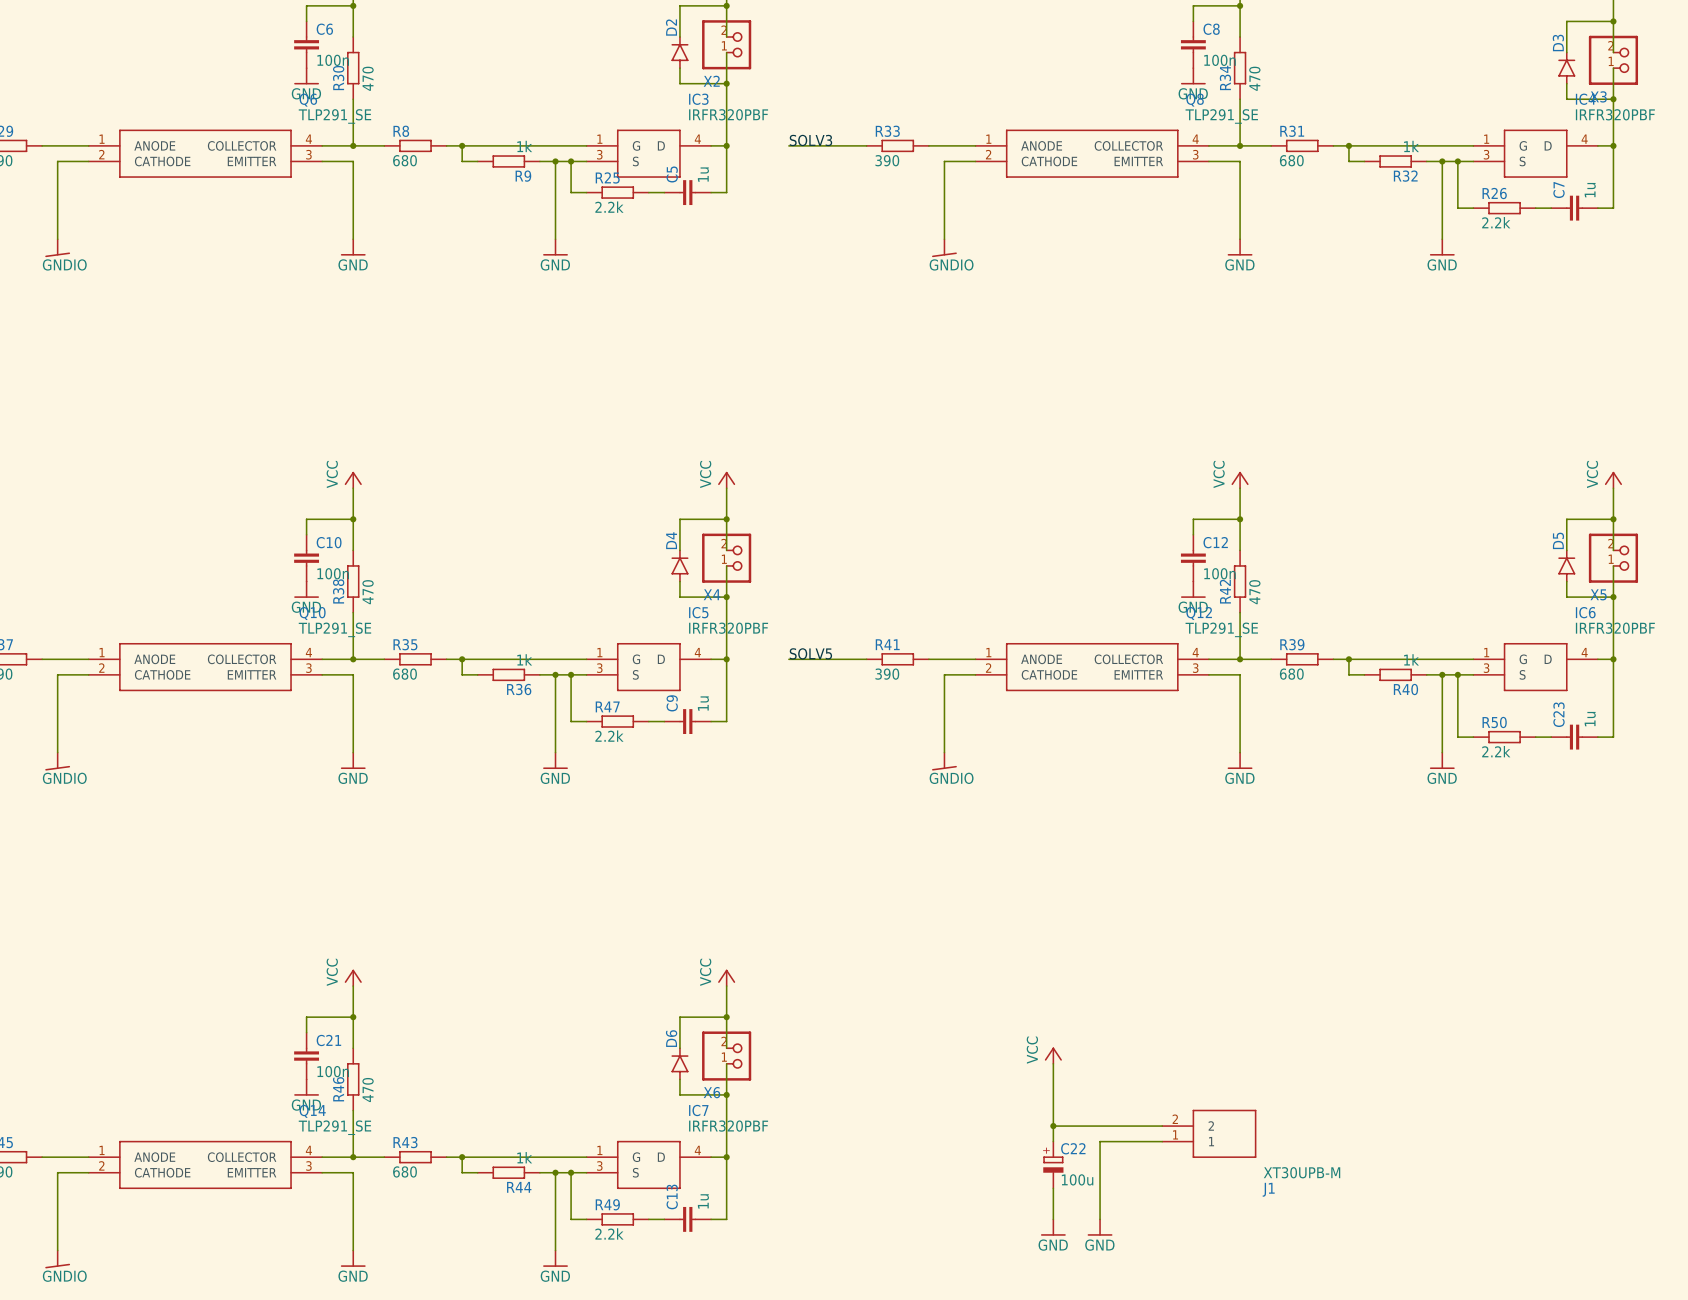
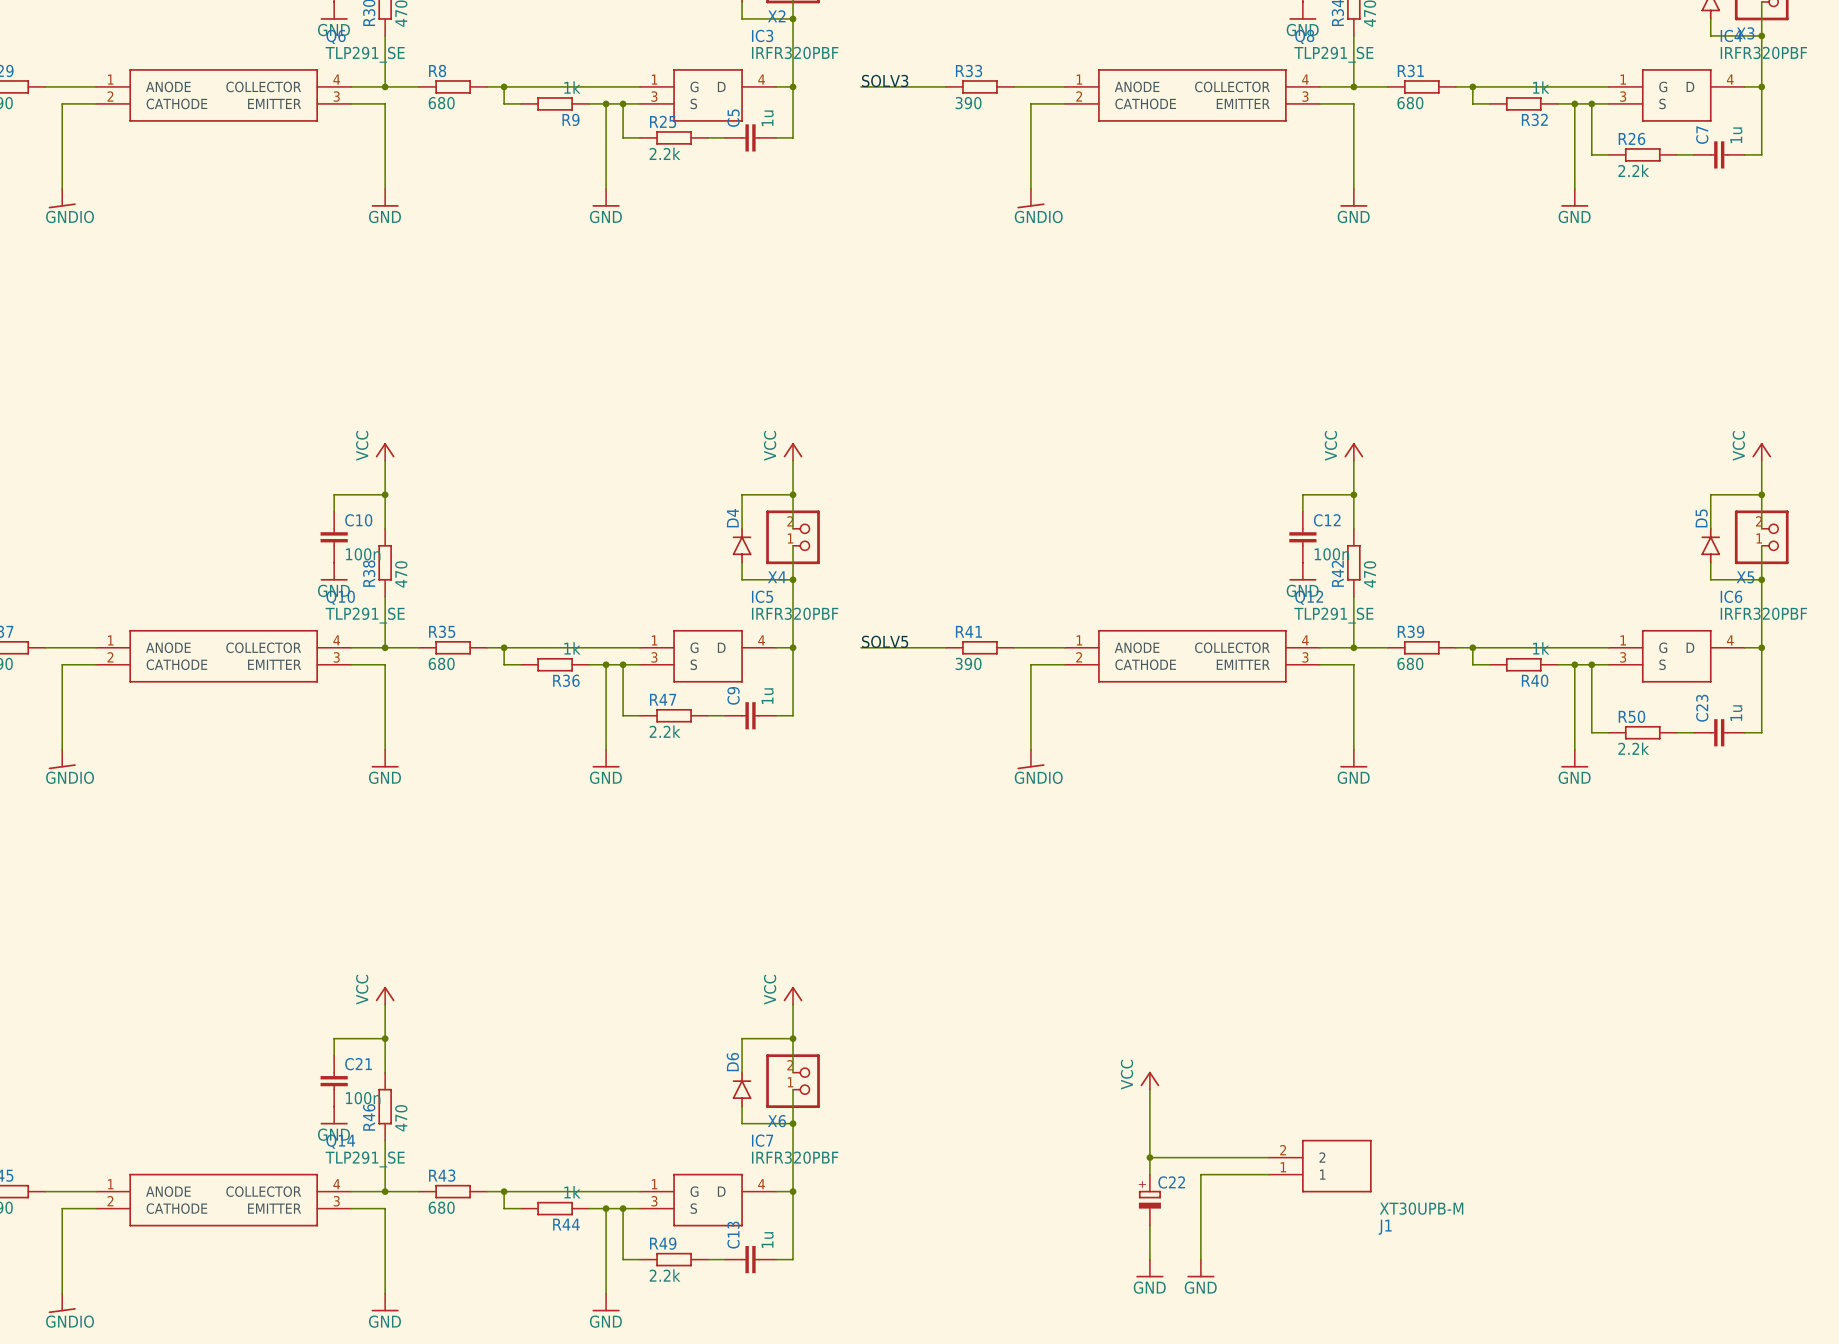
C22 value: 100u (1077, 1179) -> none

